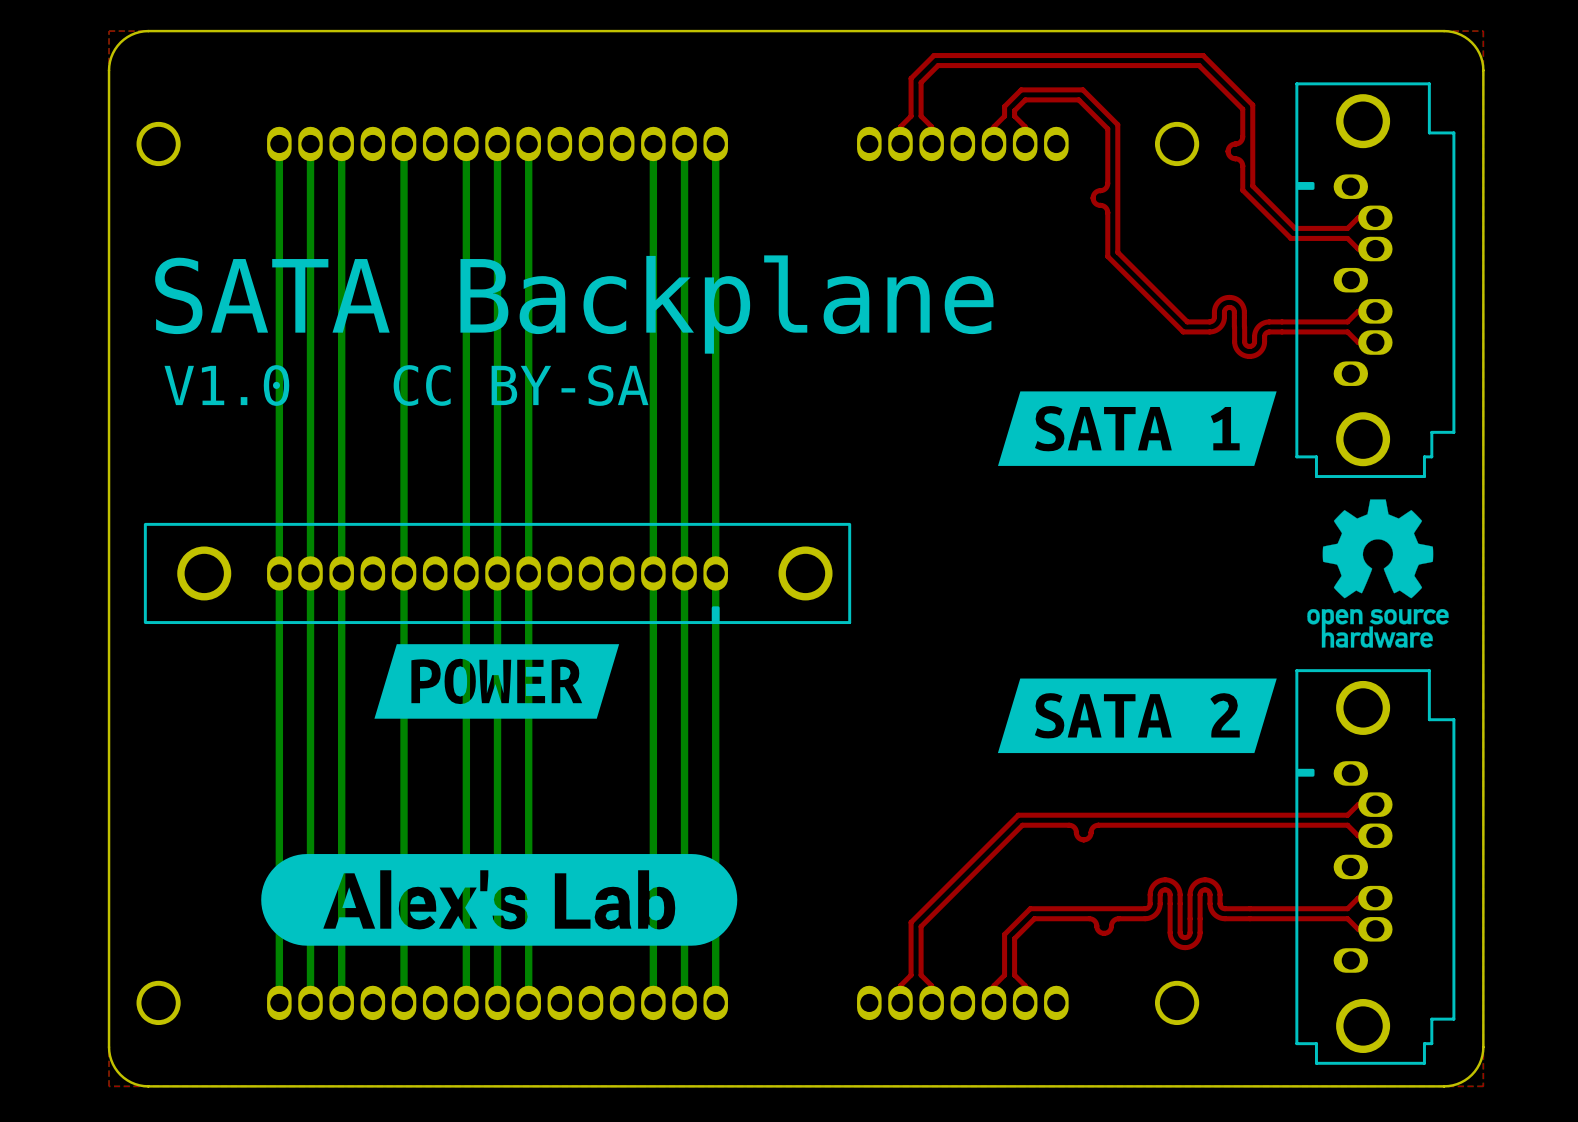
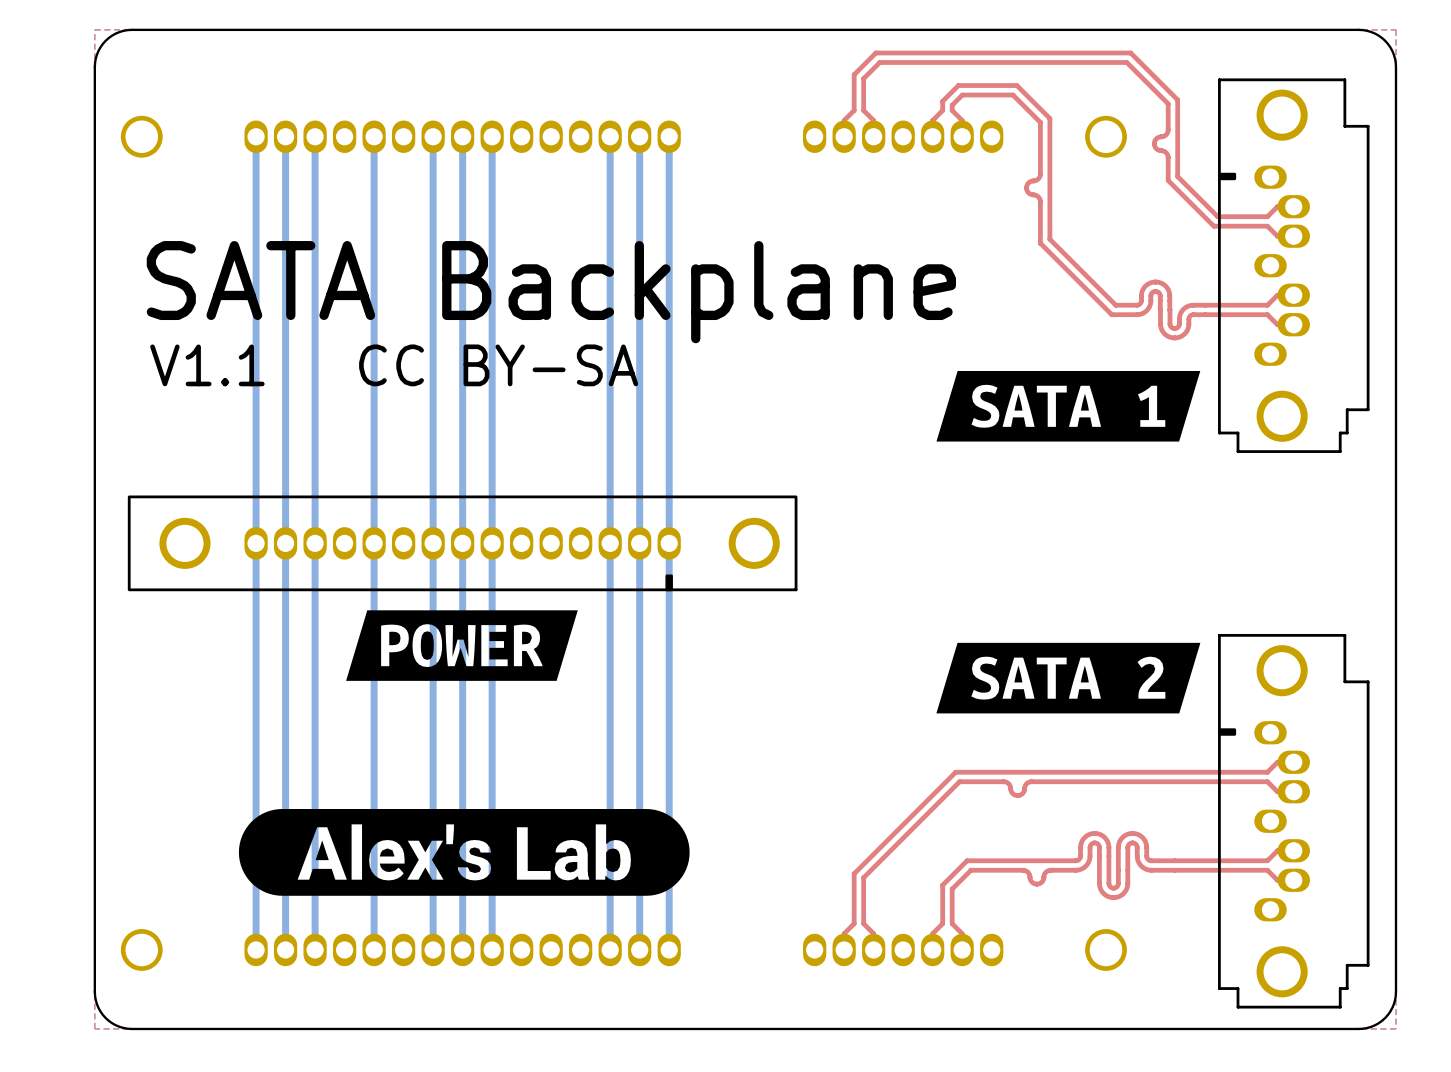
text: V1.0 CC BY-SA (406, 385) -> V1.1 CC BY-SA (394, 365)
drawing: [1307, 499, 1449, 648] -> none

